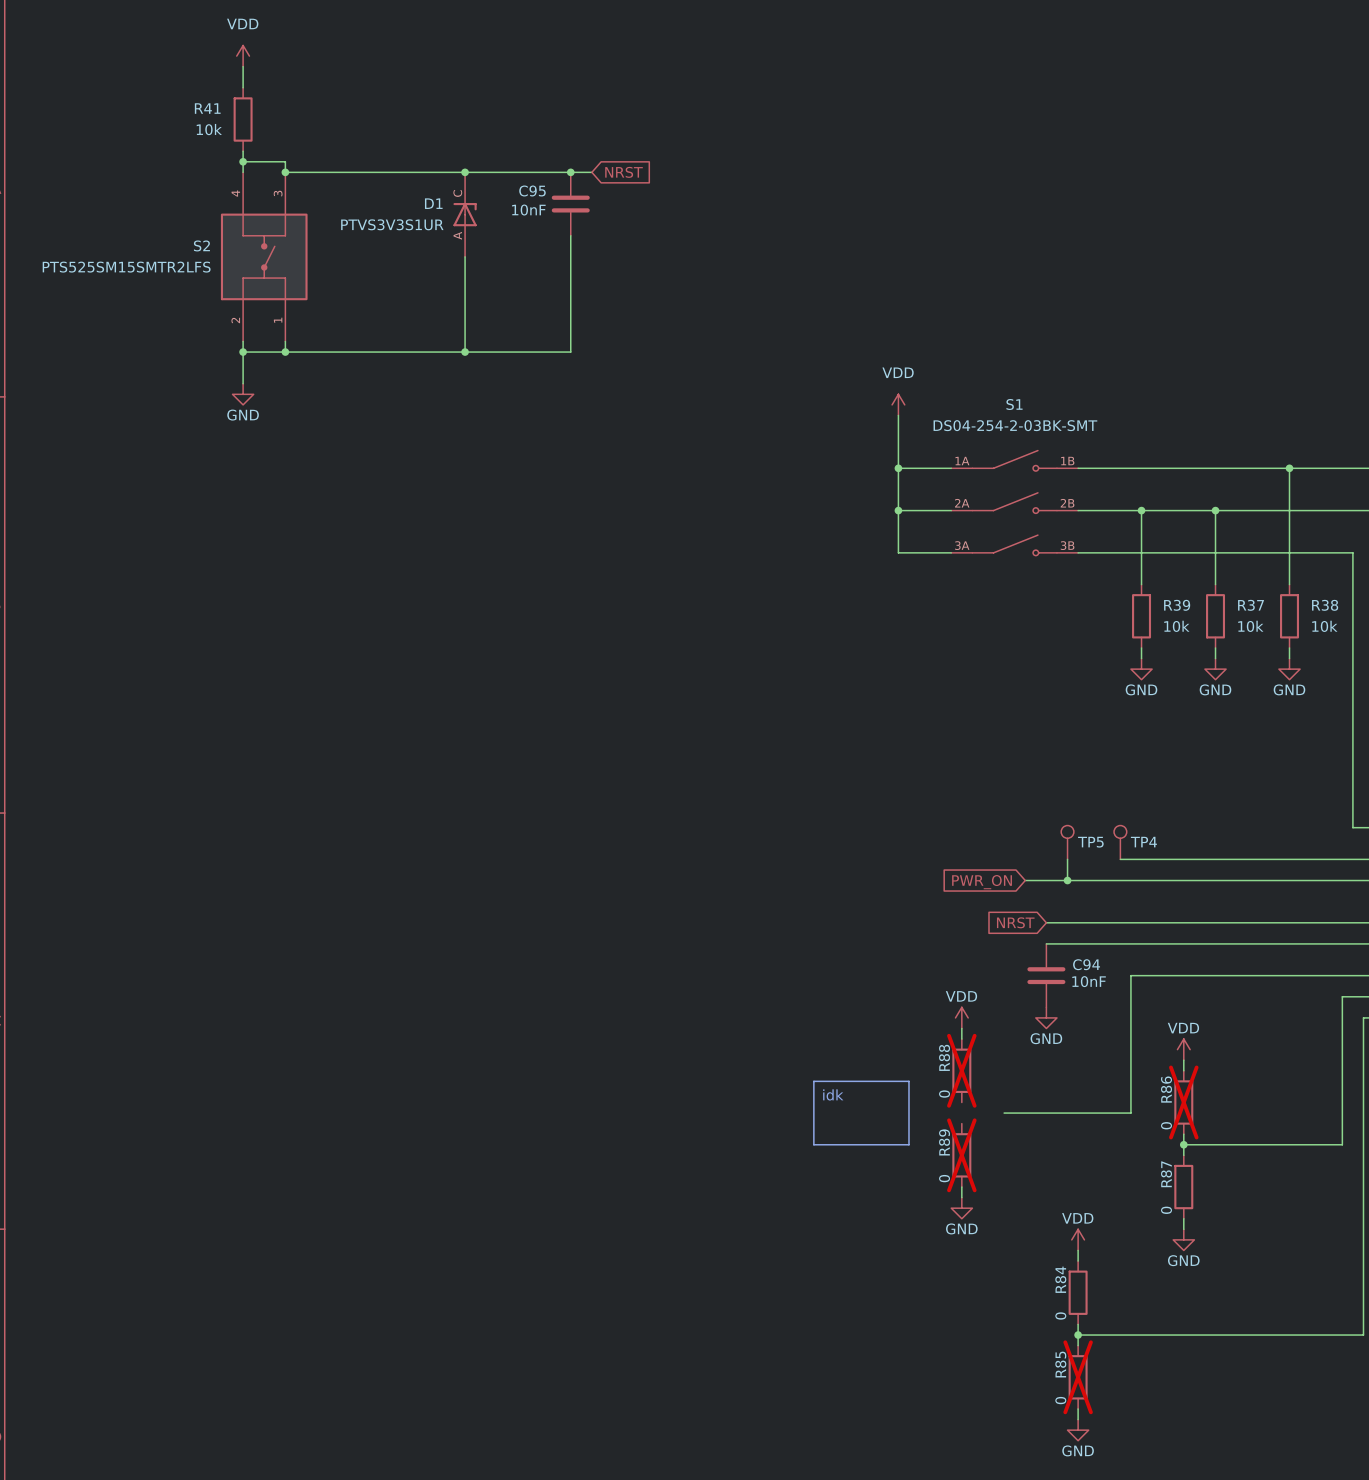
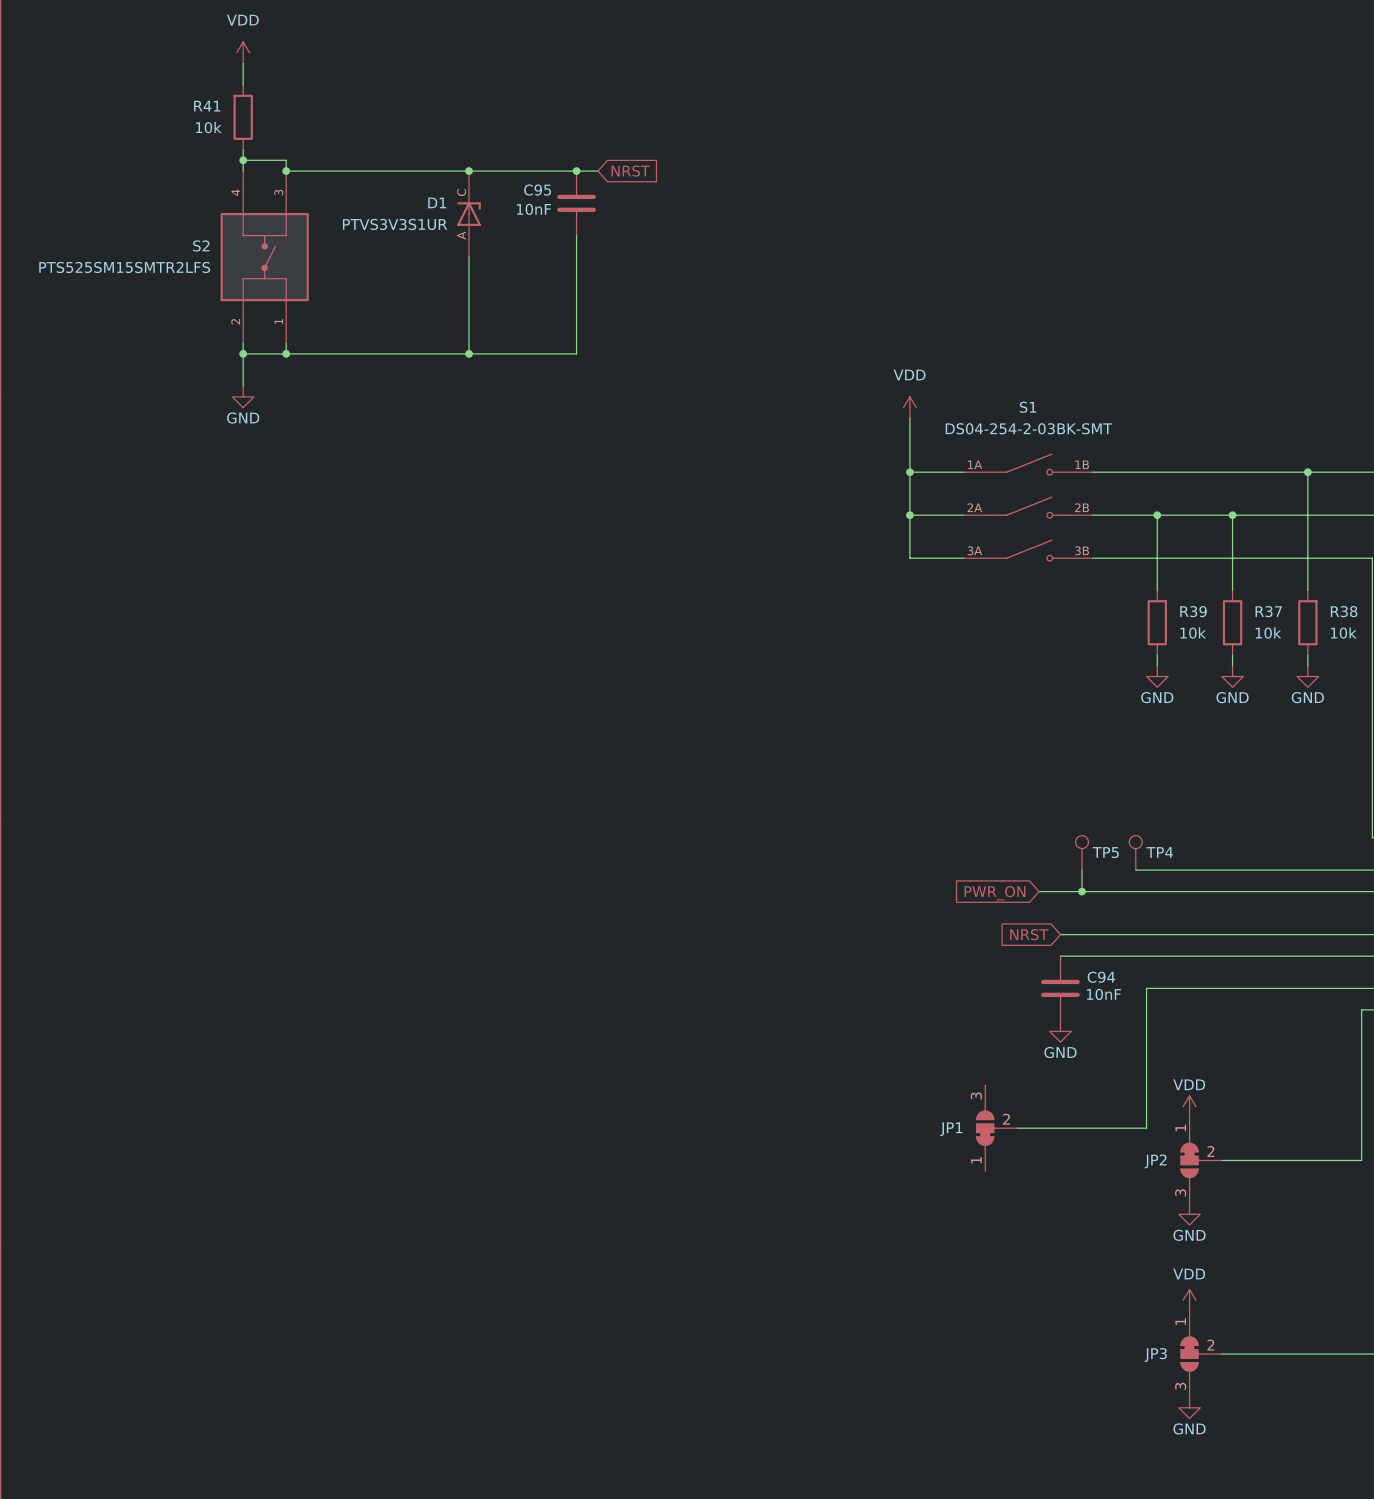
power symbol: VDD (961, 1017) -> none
wire: (961, 1028) (961, 1039) -> none
power symbol position: VDD (1183, 1049) -> VDD (1189, 1106)
wire: (1183, 1060) (1183, 1070) -> none
R88: 0 (961, 1070) -> none
line: (813, 1081) (908, 1081) (908, 1144) (813, 1144) (813, 1081) -> none
text: idk (833, 1094) -> none
R86: 0 (1183, 1102) -> none
JP1: none -> (997, 1128)
wire: (1183, 1134) (1183, 1155) -> none
junction: (1183, 1144) -> none
JP2: none -> (1201, 1160)
R89: 0 (961, 1155) -> none
wire: (961, 1187) (961, 1197) -> none
R87: 0 (1183, 1187) -> none
power symbol: GND (961, 1208) -> none
wire: (1183, 1218) (1183, 1229) -> none
power symbol: VDD (1078, 1239) -> none
power symbol position: GND (1183, 1239) -> GND (1189, 1214)
wire: (1078, 1250) (1078, 1261) -> none
power symbol: none -> VDD (1189, 1300)
R84: 0 (1078, 1292) -> none
wire: (1078, 1324) (1078, 1345) -> none
wire: (1078, 1335) (1204, 1335) -> none
junction: (1078, 1335) -> none
JP3: none -> (1201, 1354)
R85: 0 (1078, 1377) -> none
power symbol: none -> GND (1189, 1407)
wire: (1078, 1409) (1078, 1419) -> none
power symbol: GND (1078, 1430) -> none

